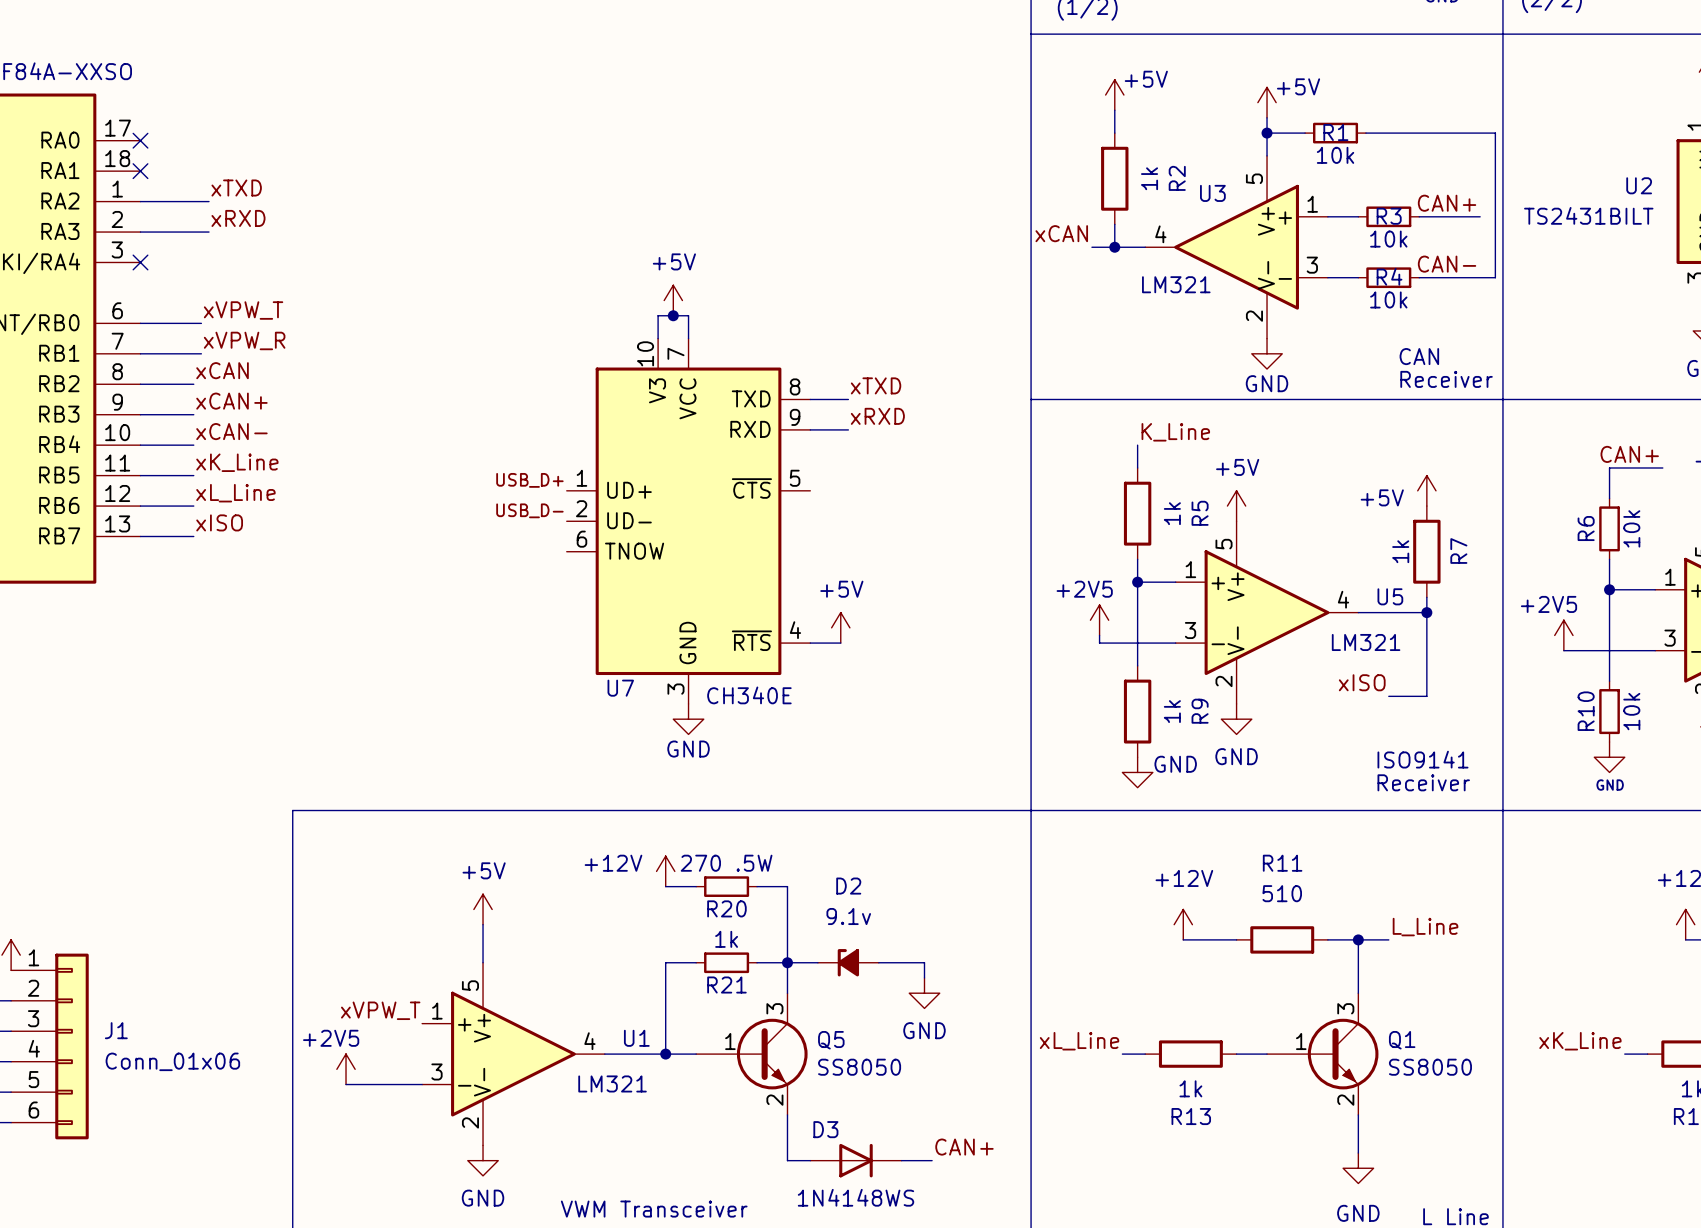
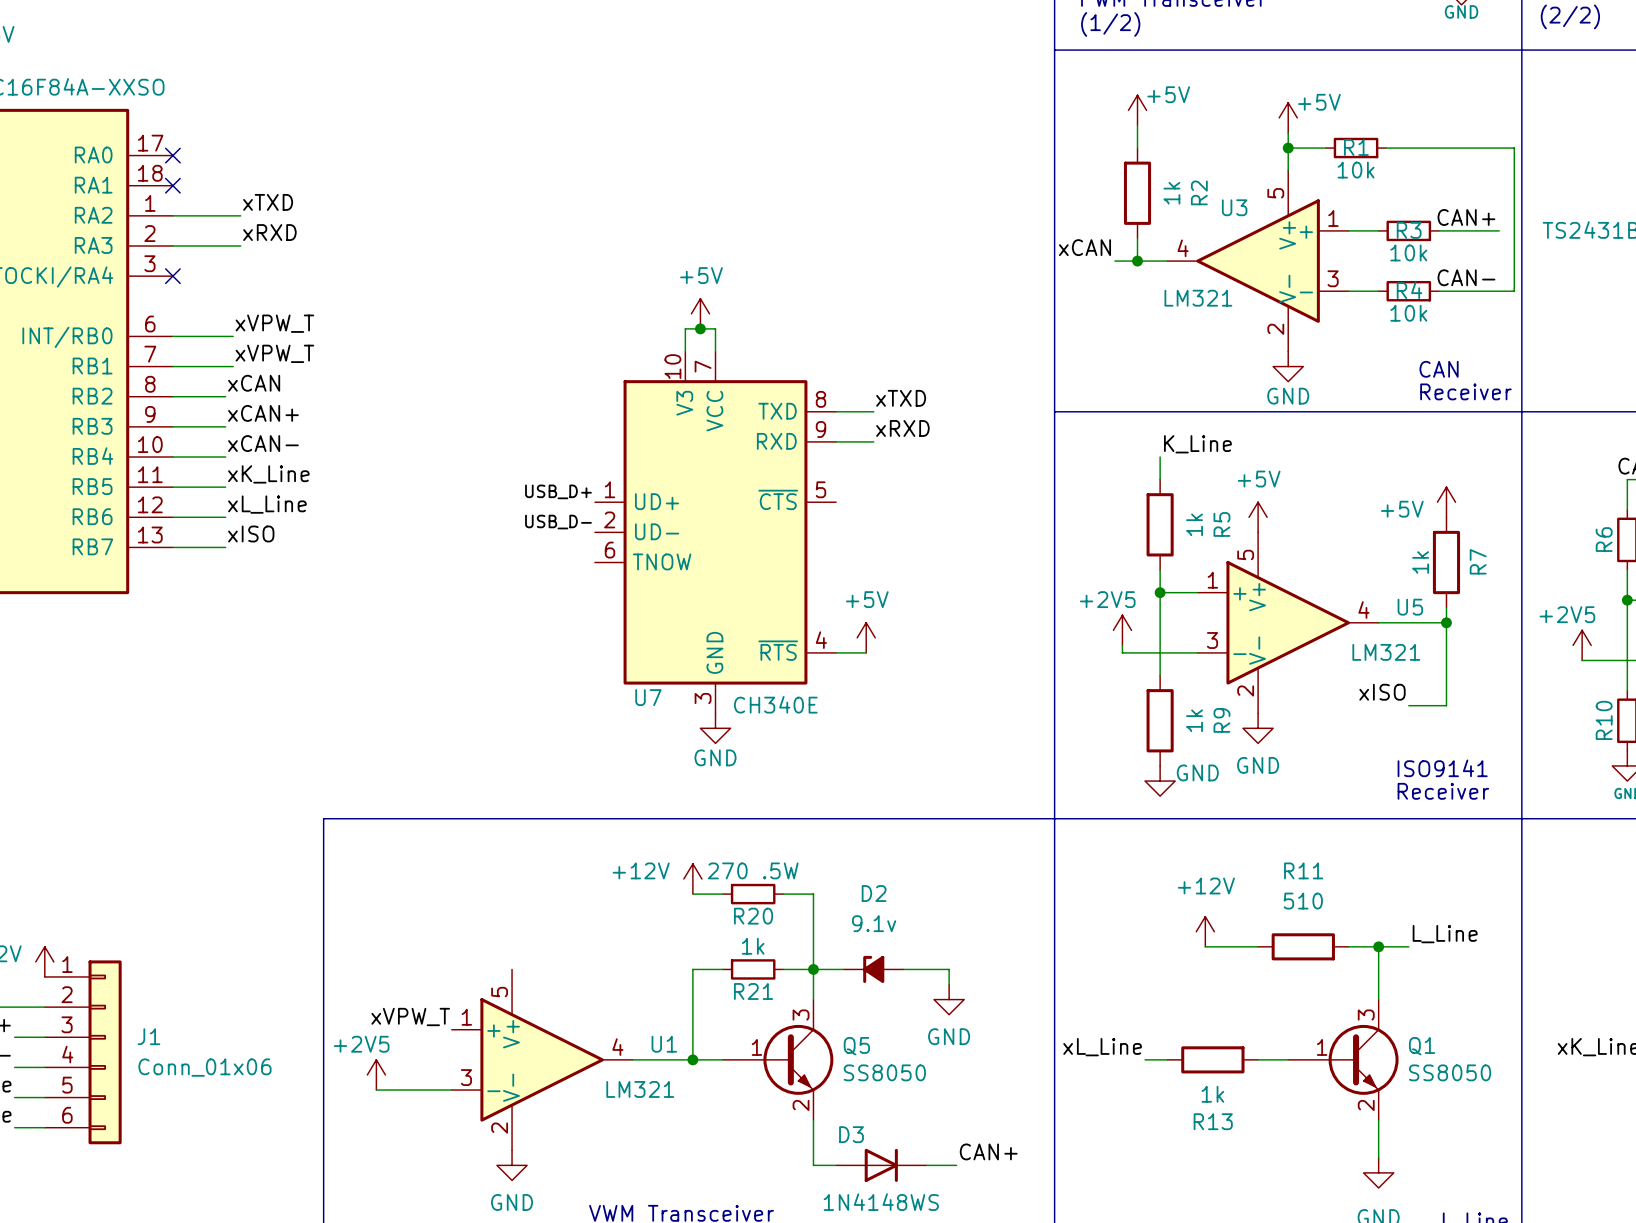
label: xVPW_R (244, 340) -> xVPW_T (274, 353)
power symbol: +5V (483, 909) -> none
wire: (483, 924) (483, 962) -> none

